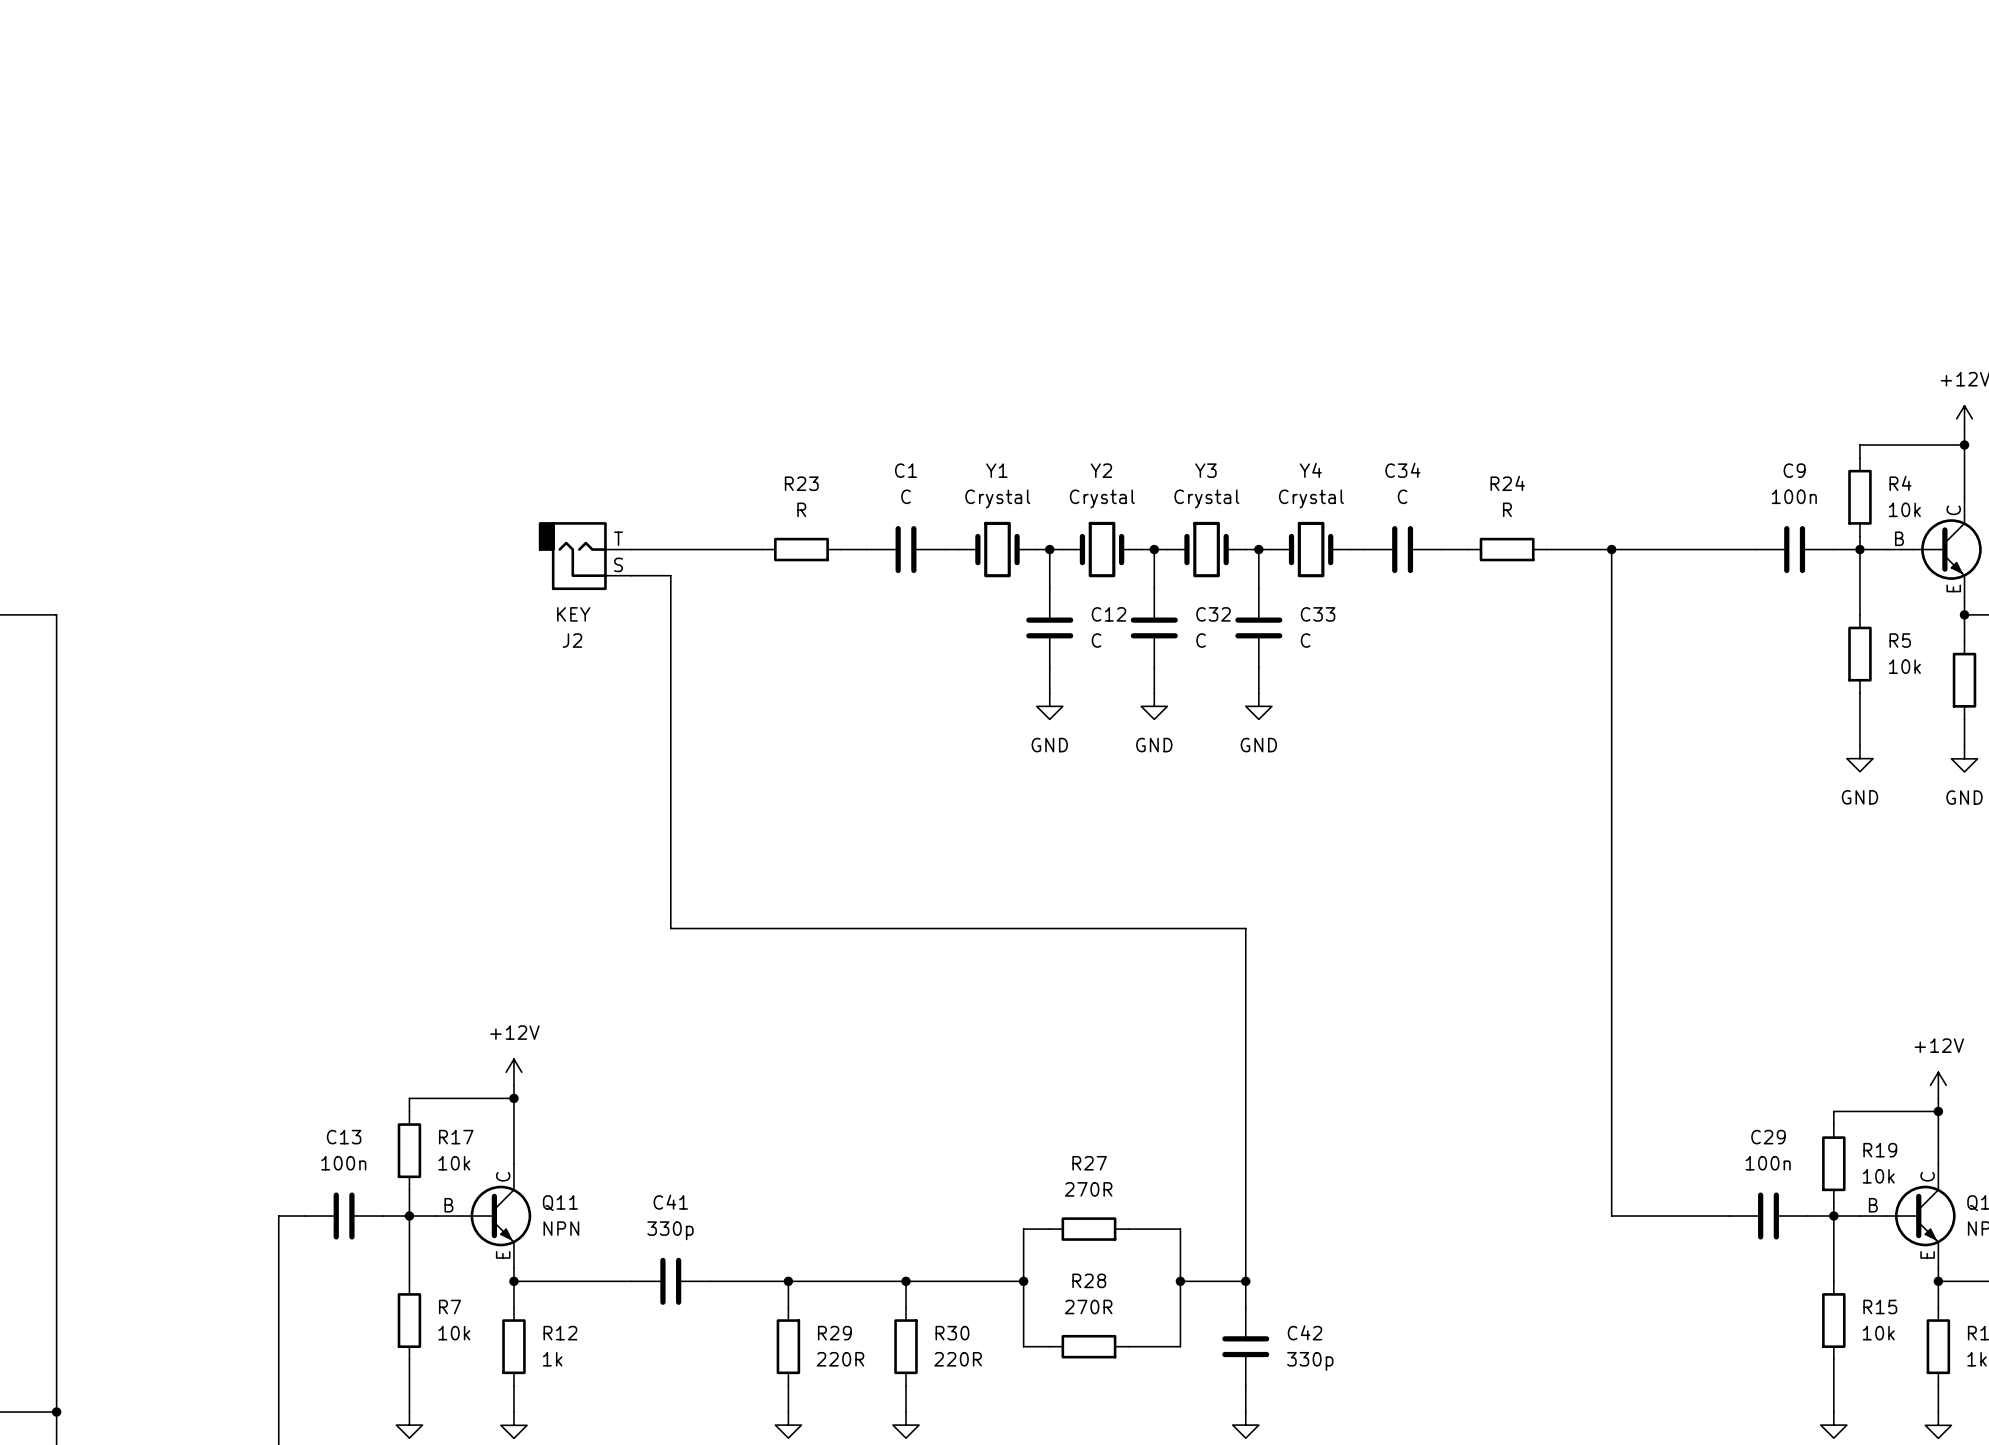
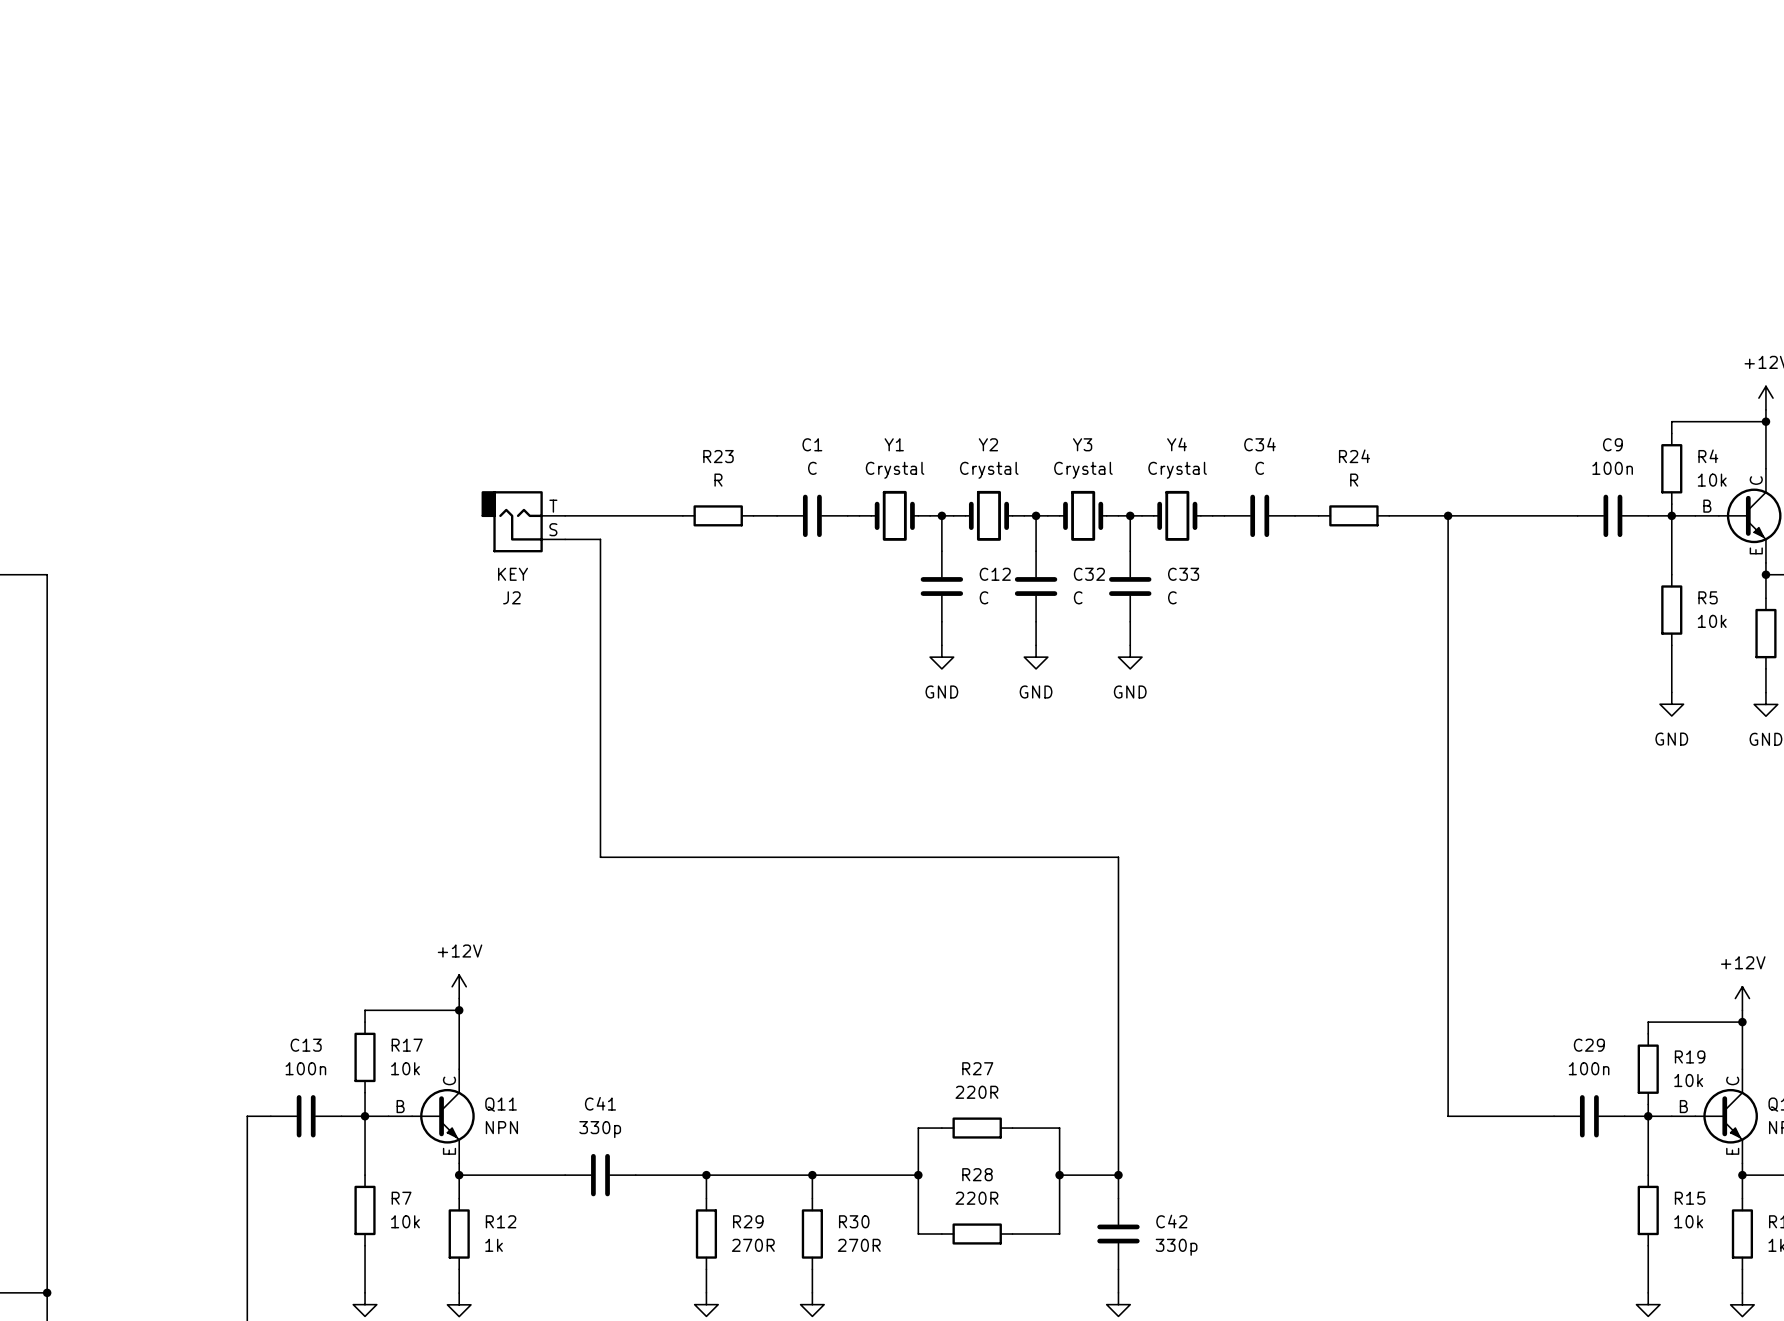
R27 value: 270R (1088, 1189) -> 220R (976, 1092)
R28 value: 270R (1088, 1306) -> 220R (976, 1198)
R29 value: 220R (840, 1359) -> 270R (753, 1245)
R30 value: 220R (958, 1359) -> 270R (859, 1245)

